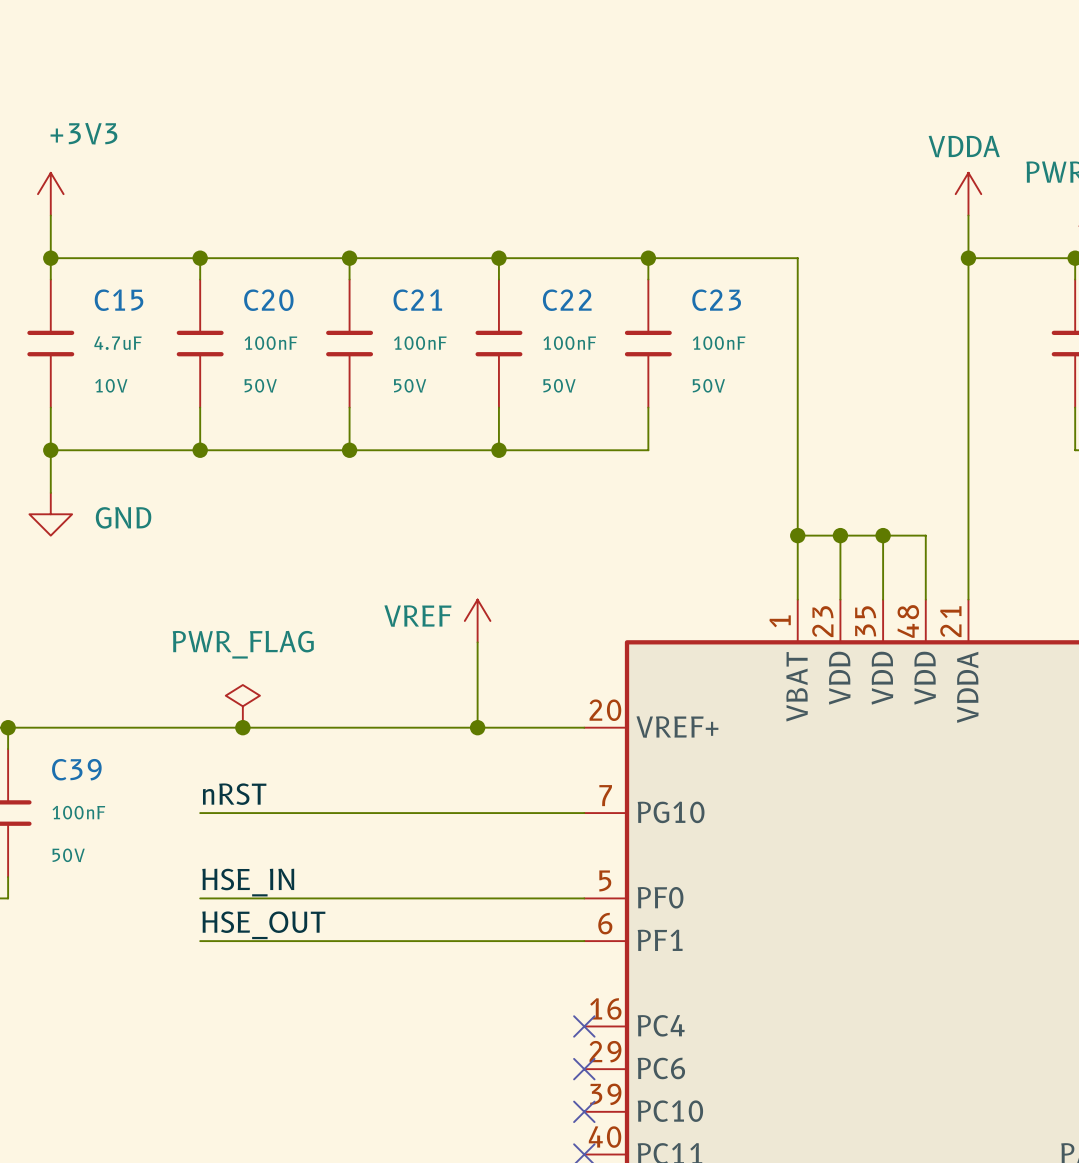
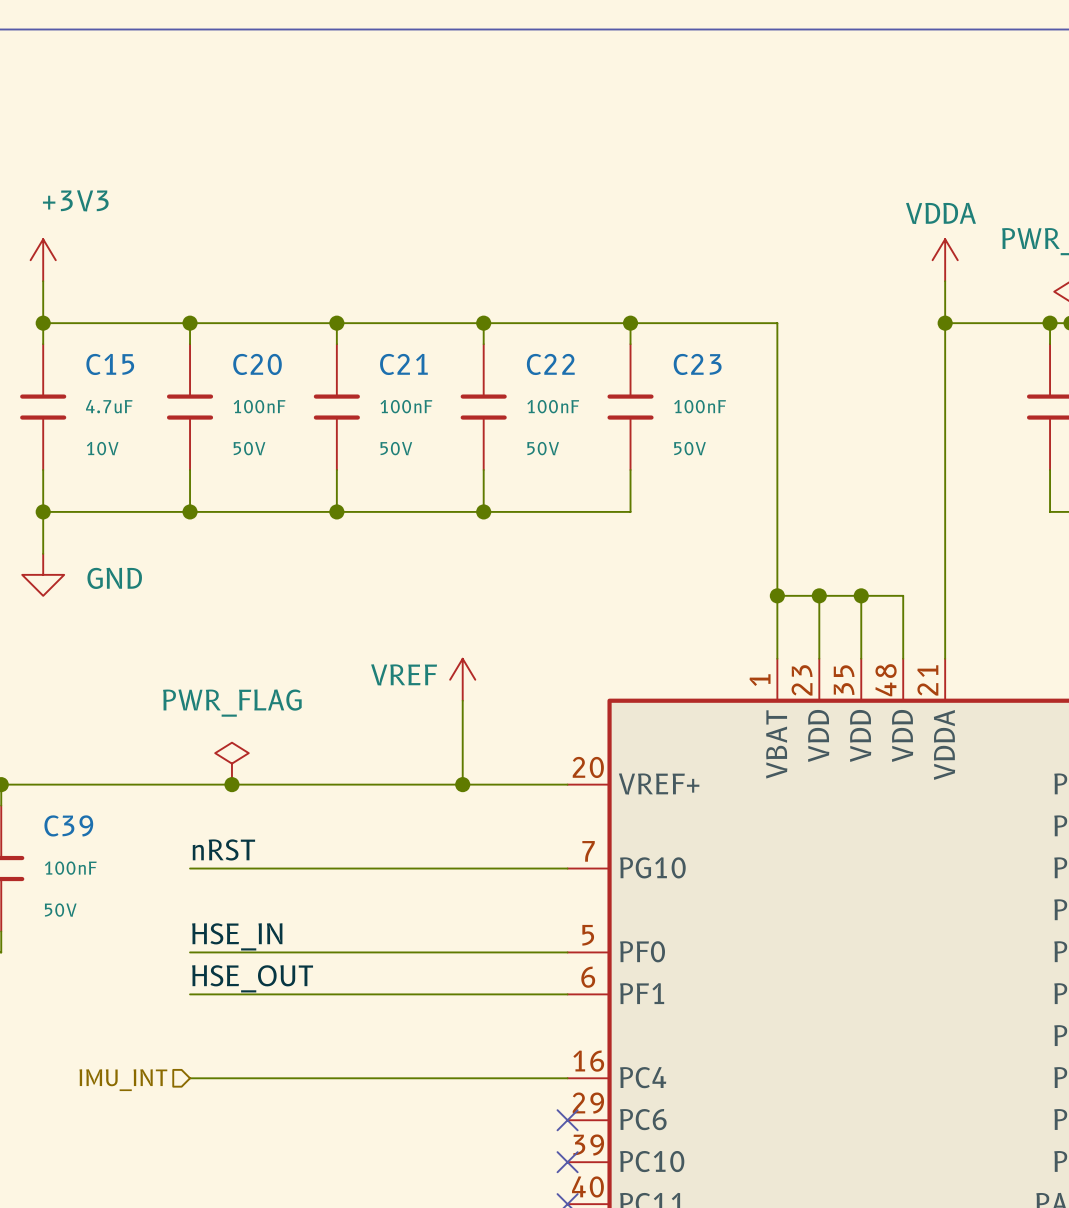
wire: none -> (190, 1078) (567, 1078)
no-connect mark: (584, 1026) -> none
hierarchical label: none -> IMU_INT (123, 1080)

